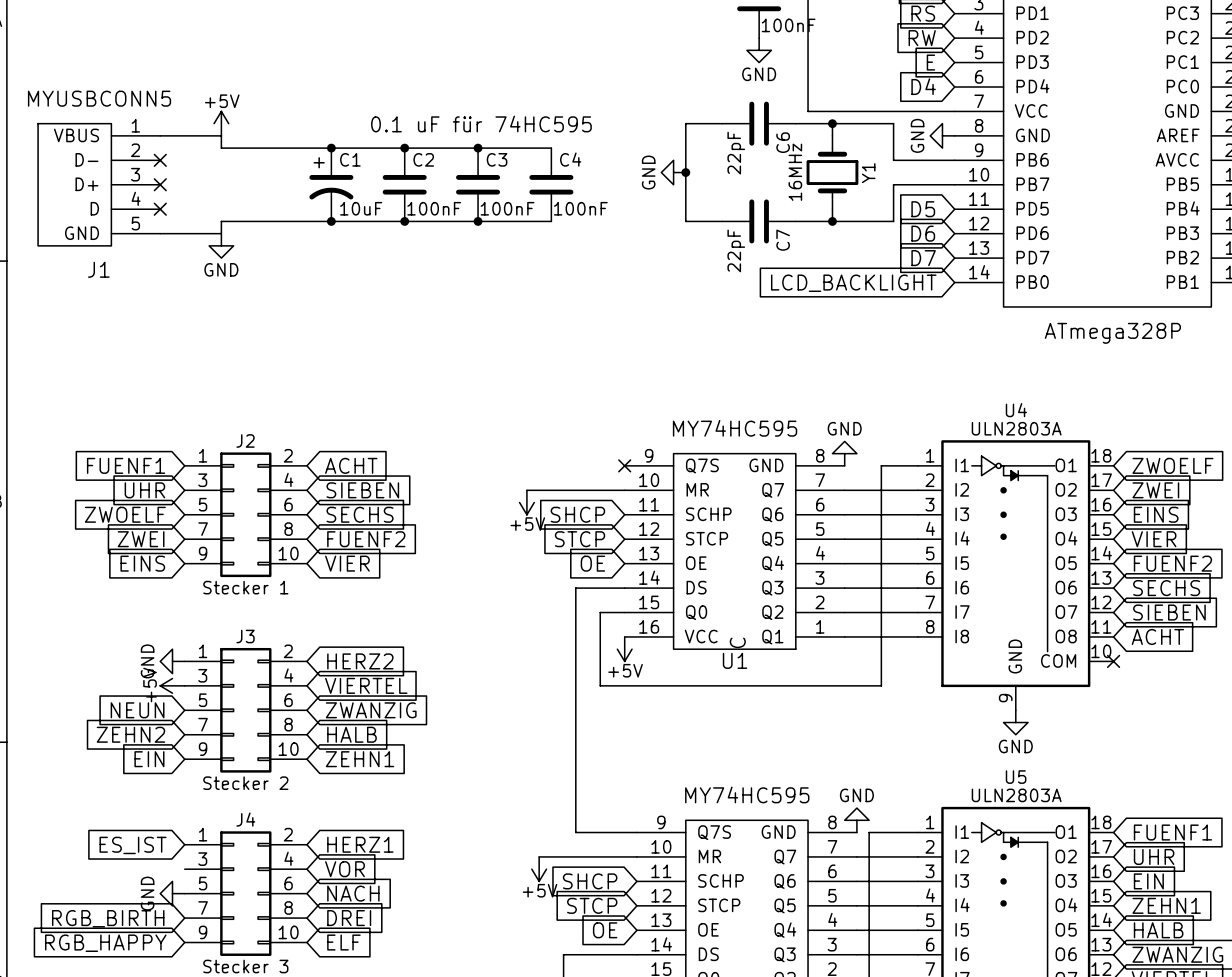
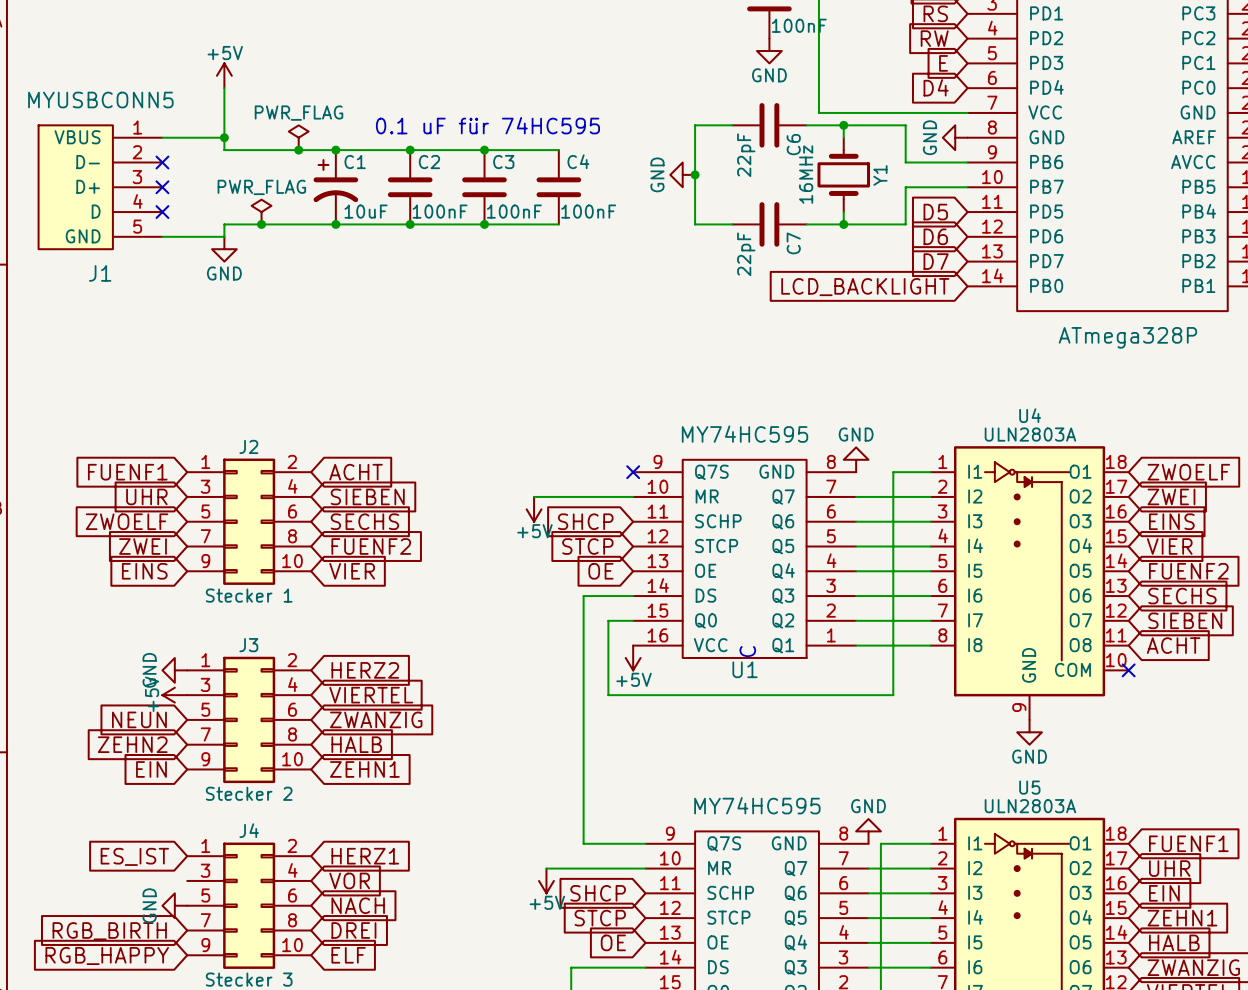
power symbol position: +5V (221, 123) -> +5V (224, 75)
junction: none -> (224, 137)
power symbol: none -> PWR_FLAG (298, 137)
junction: none -> (298, 150)
power symbol: none -> PWR_FLAG (261, 212)
junction: none -> (261, 224)

